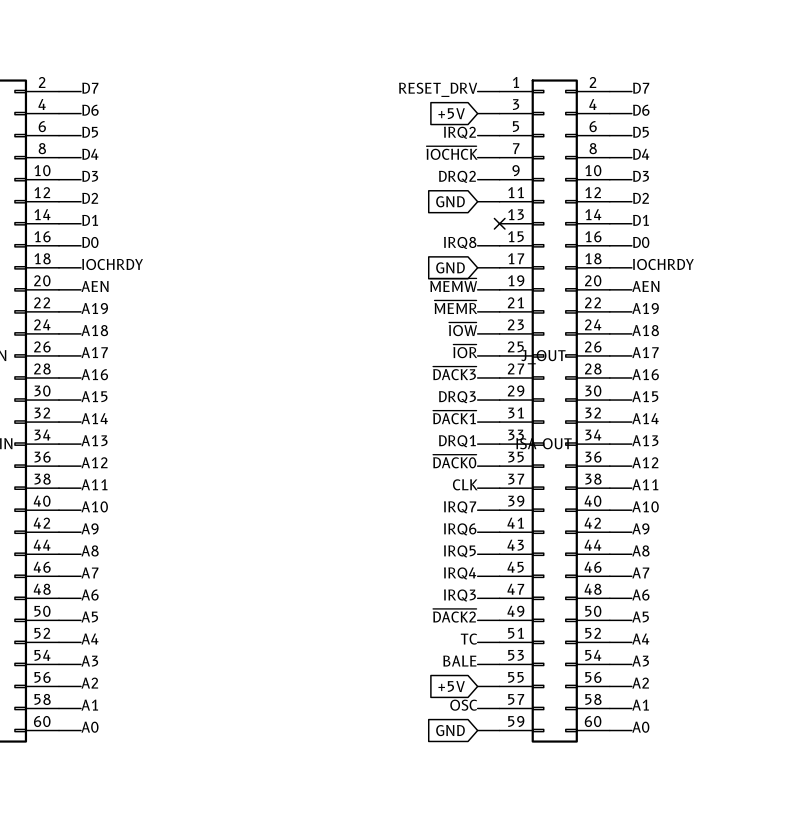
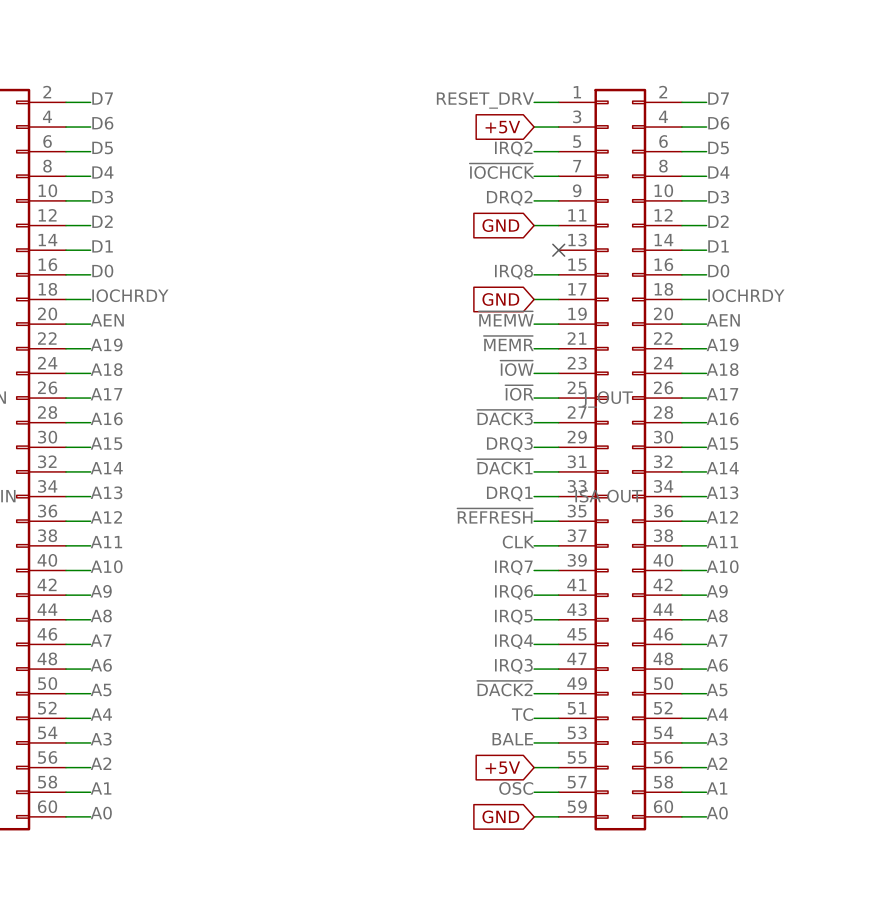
label: ~{DACK0} (454, 461) -> ~{REFRESH} (495, 516)

